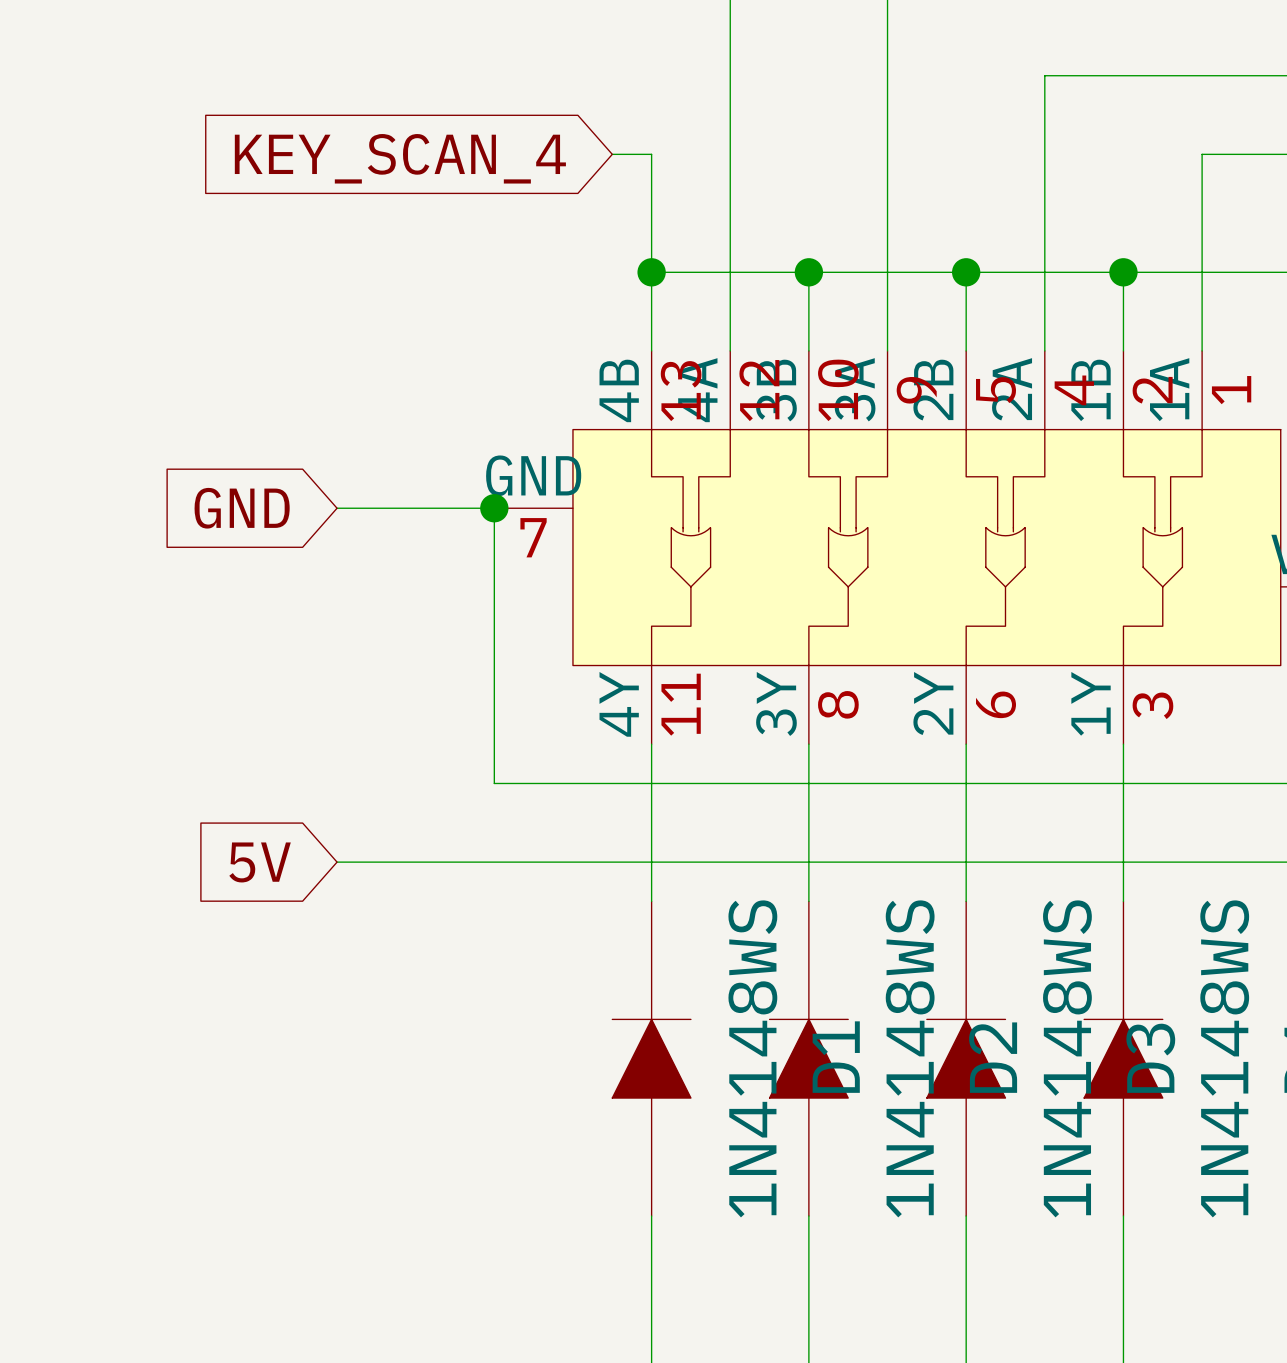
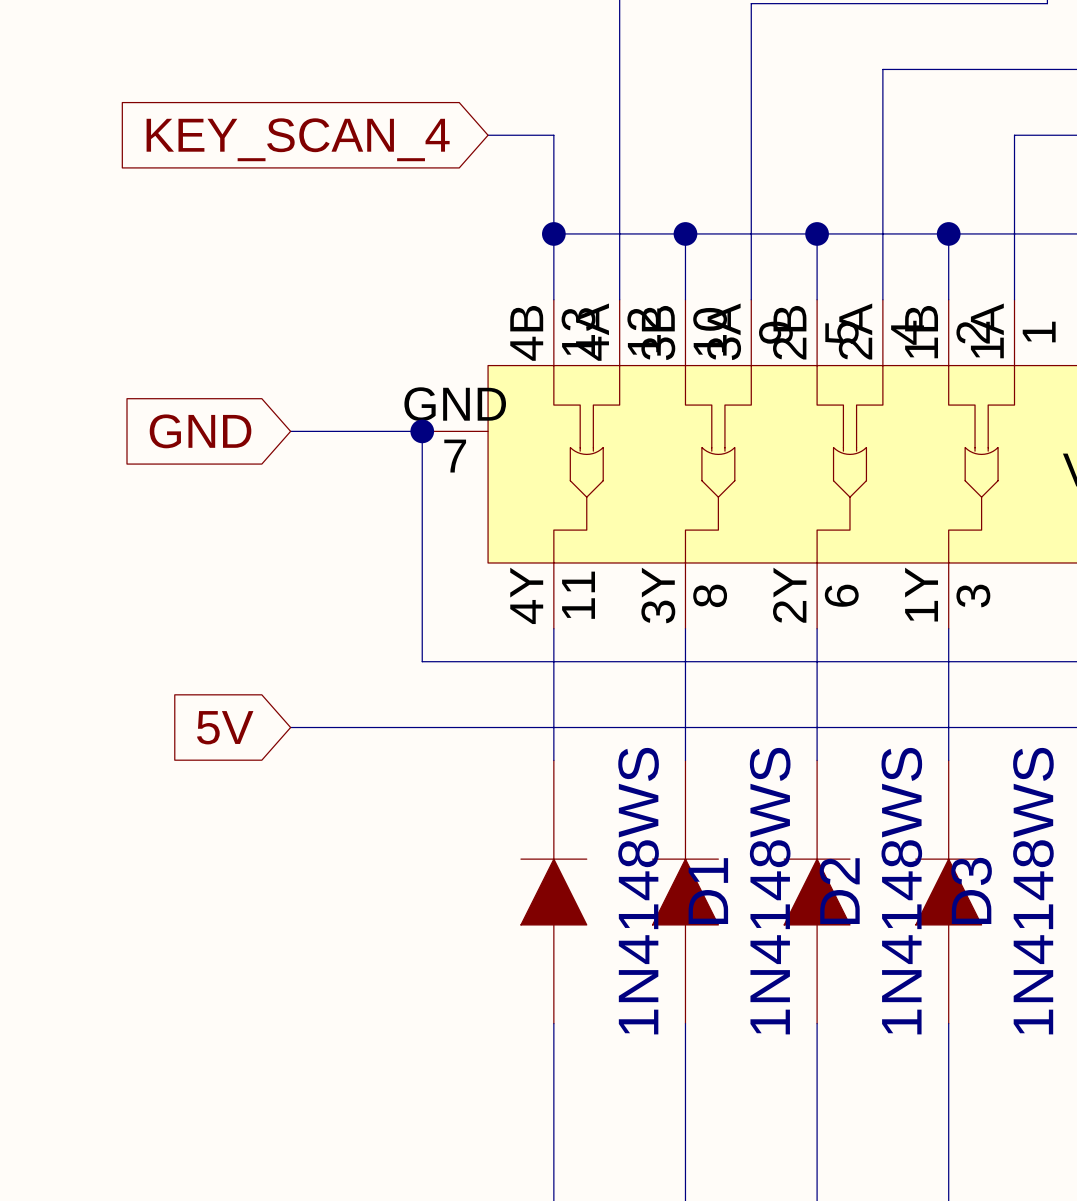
wire: none -> (488, 135) (520, 135)
global label position: KEY_SCAN_4 (400, 158) -> KEY_SCAN_4 (298, 139)

